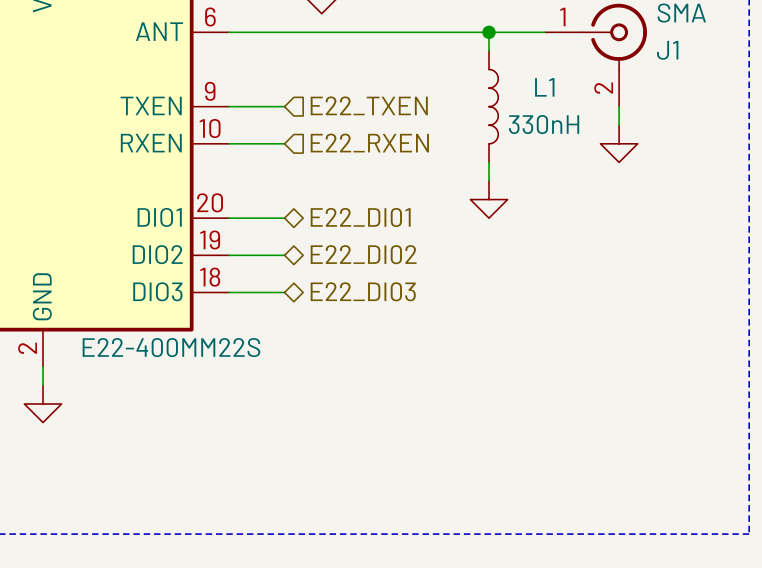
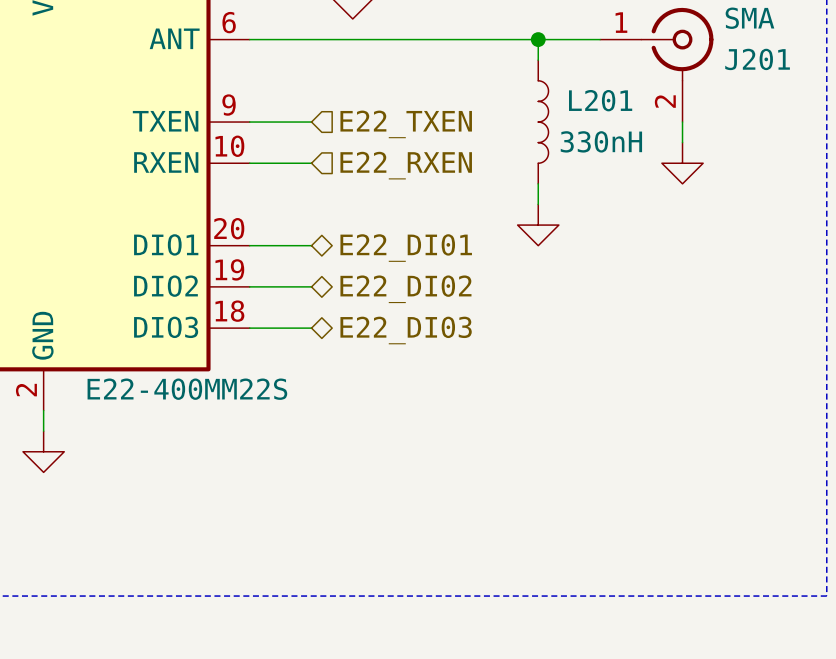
J1 name: J1 (667, 50) -> J201 (757, 59)
L1 name: L1 (544, 87) -> L201 (600, 100)

